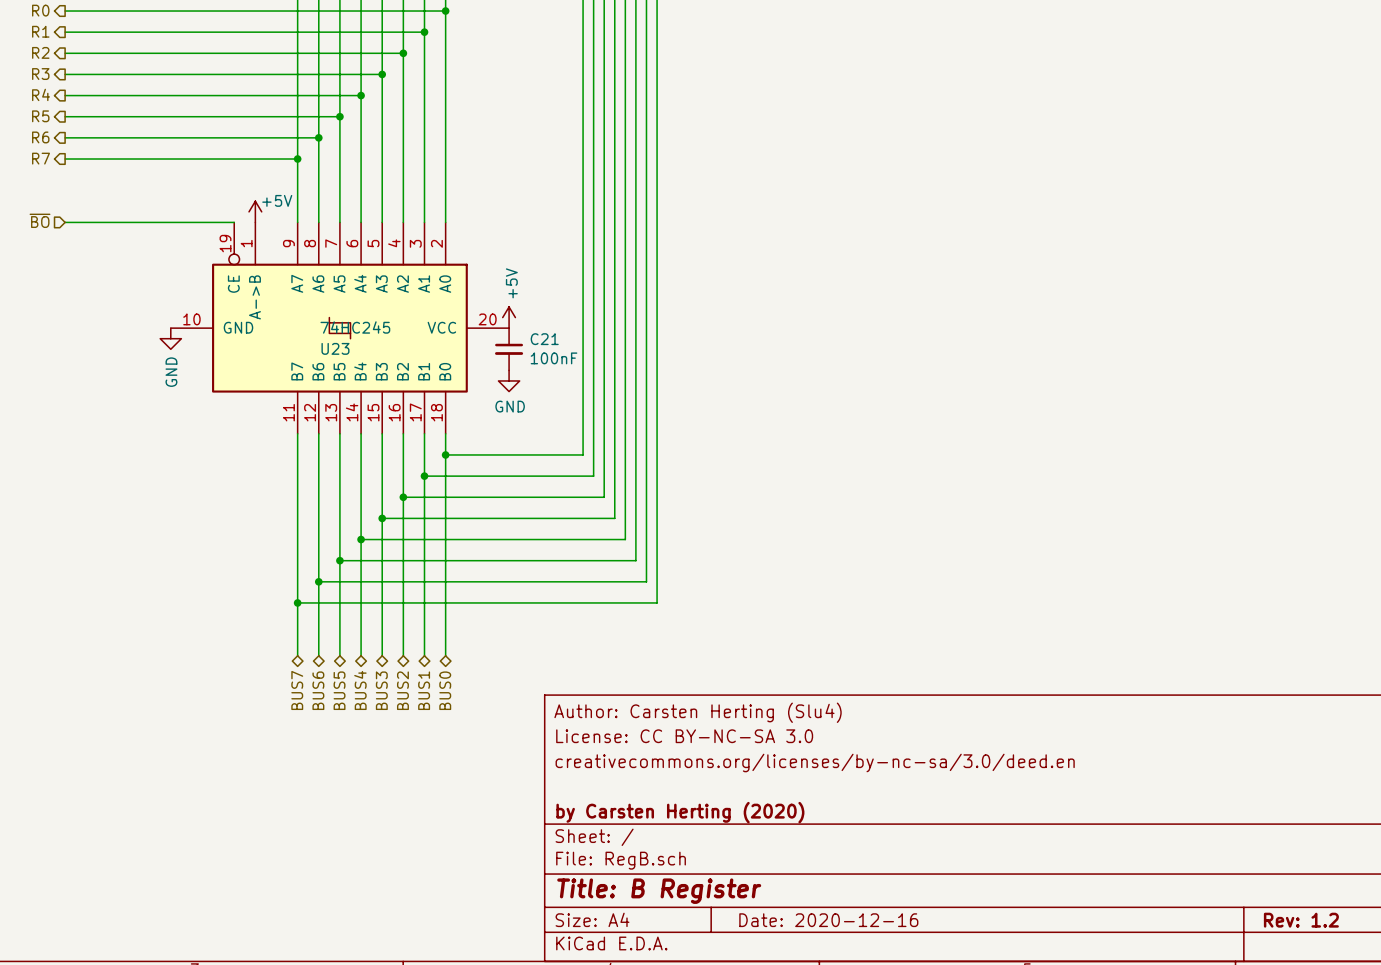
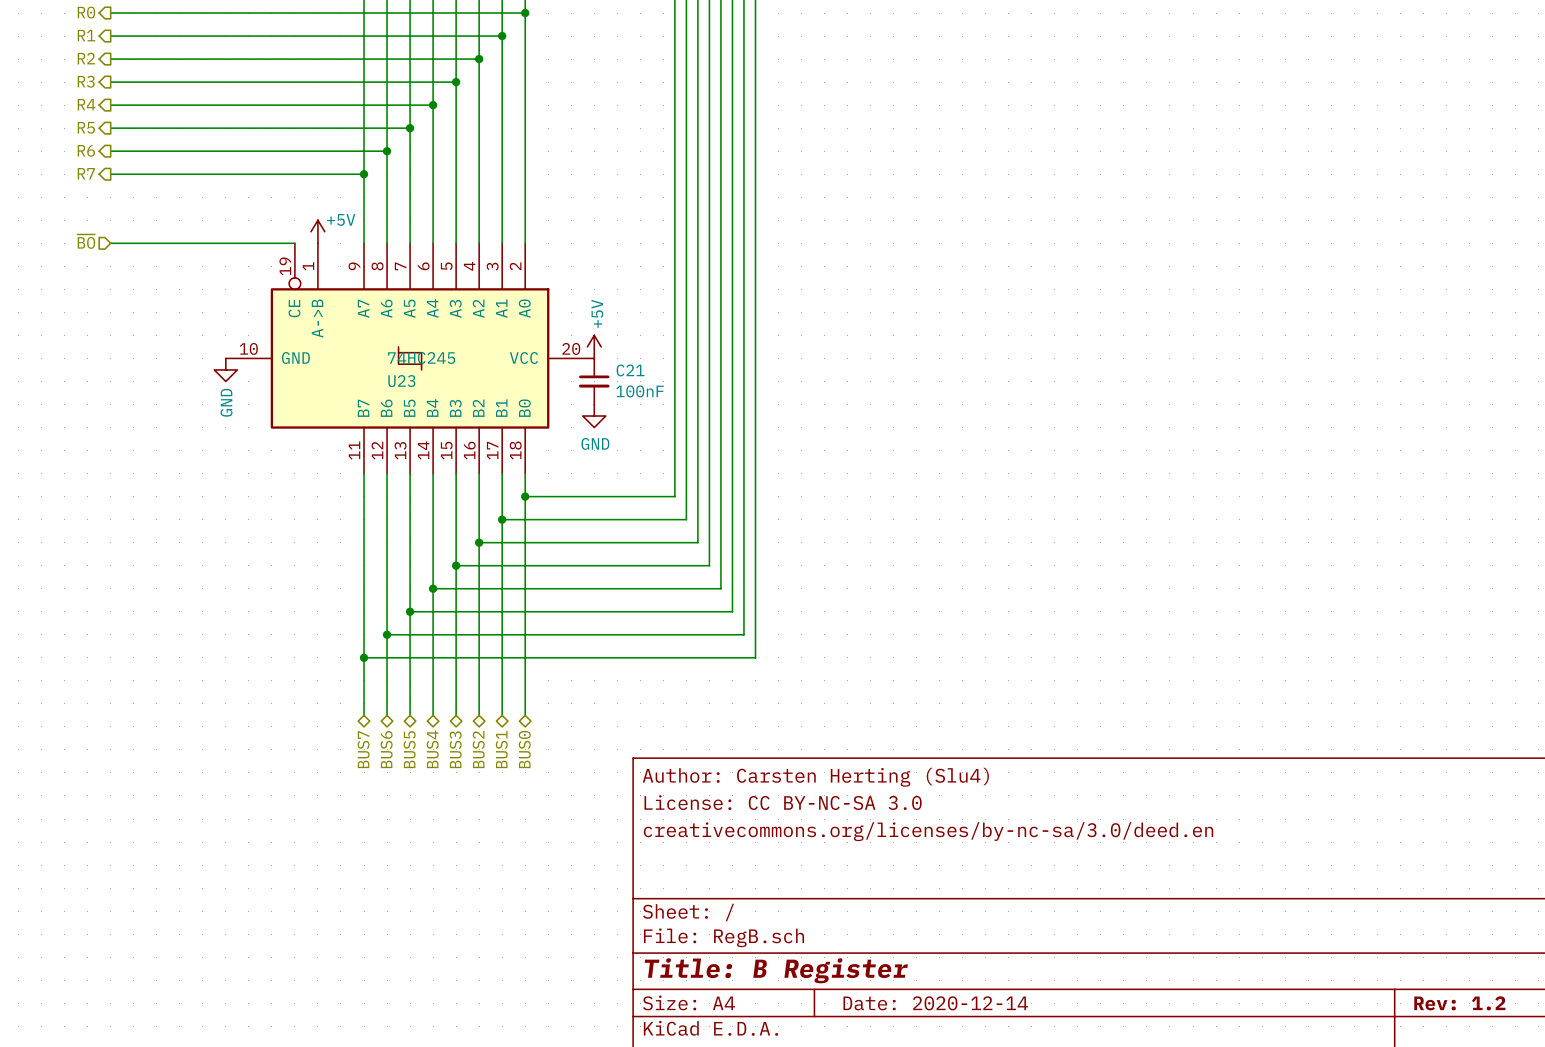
title block: by Carsten Herting (2020) (680, 812) -> none
title block: Date: 2020-12-16 (828, 920) -> Date: 2020-12-14 (935, 1003)

